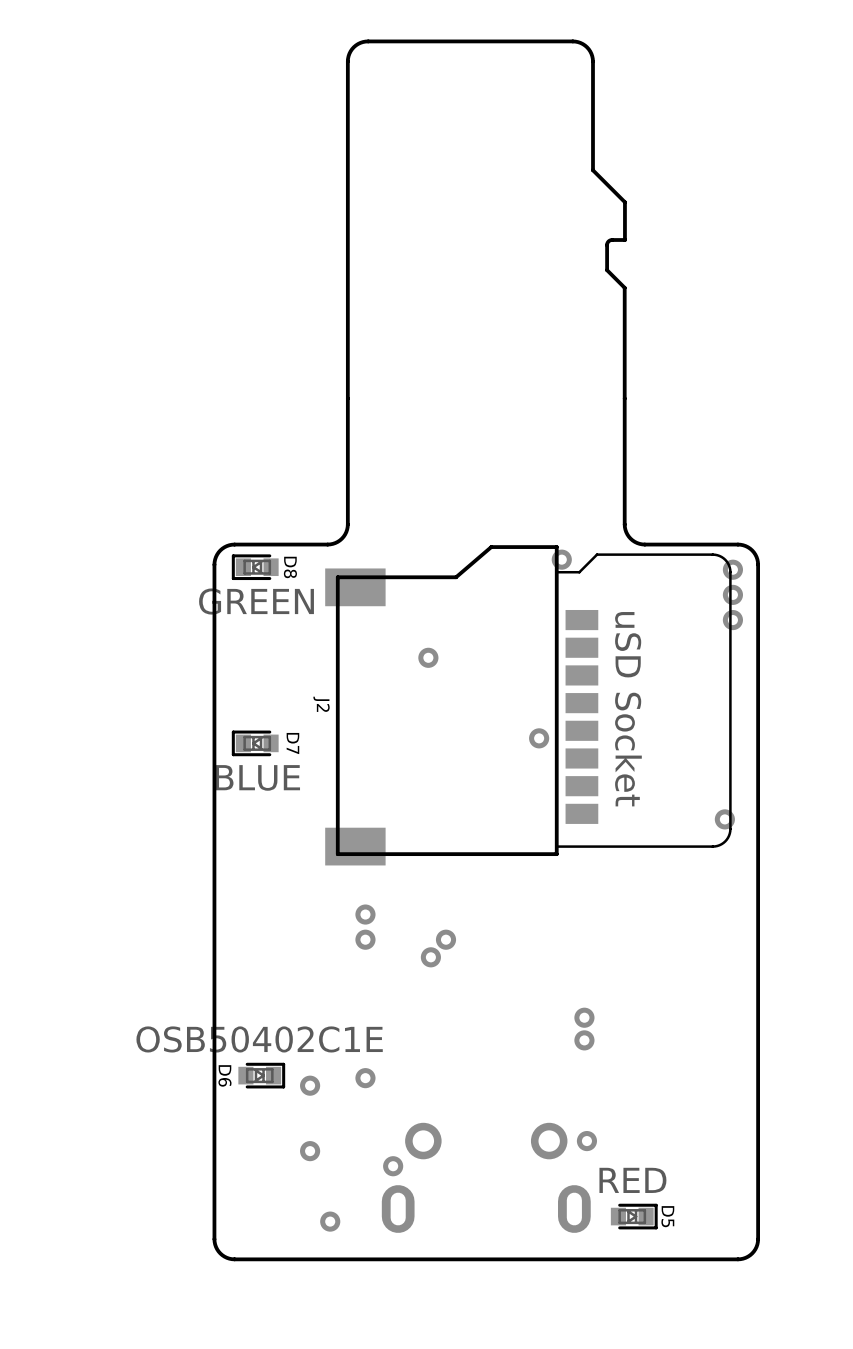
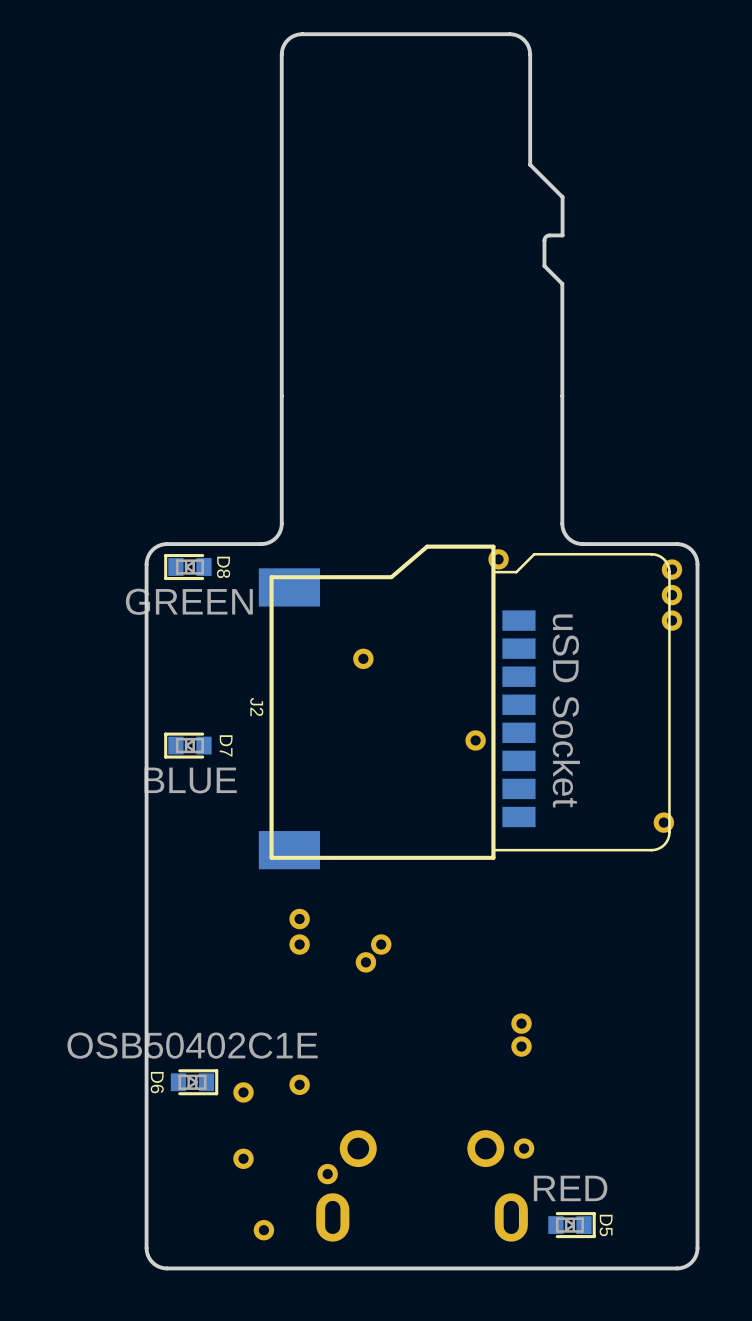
J2 footprint: [325, 545, 732, 866] -> [258, 544, 671, 870]

